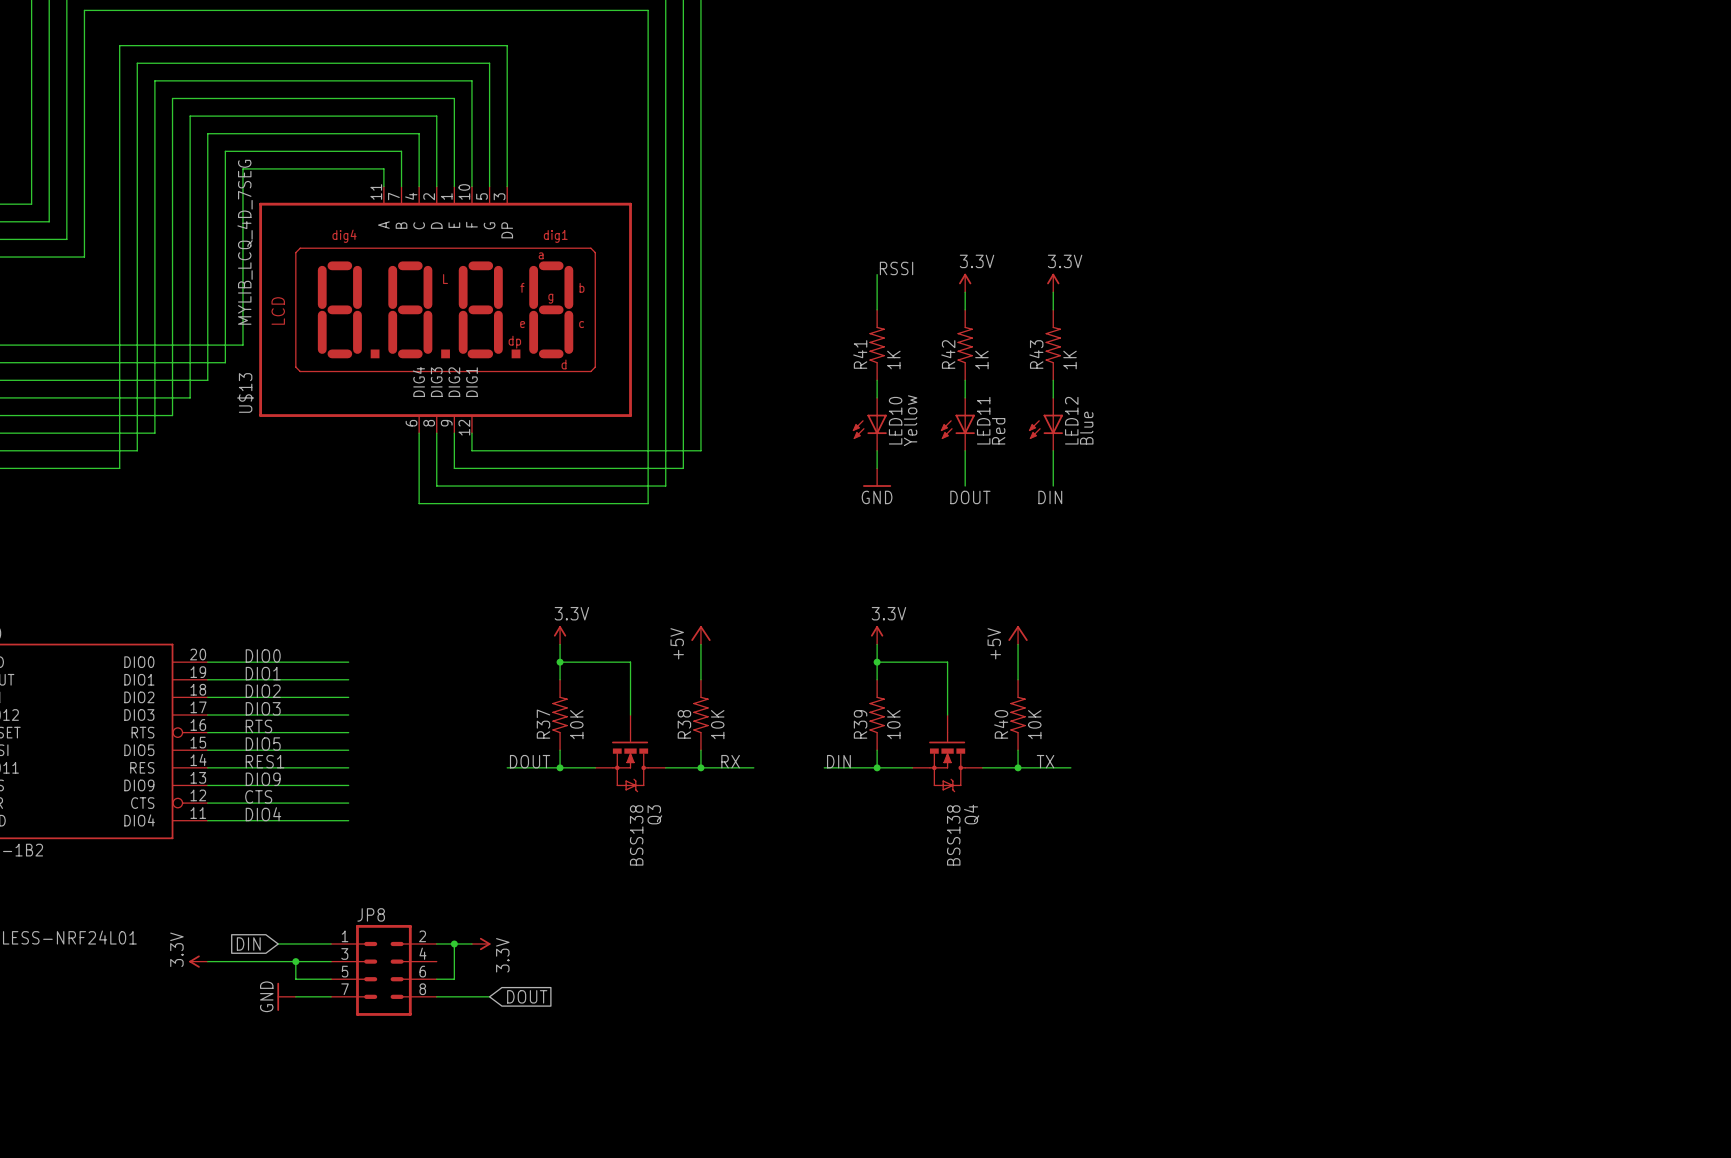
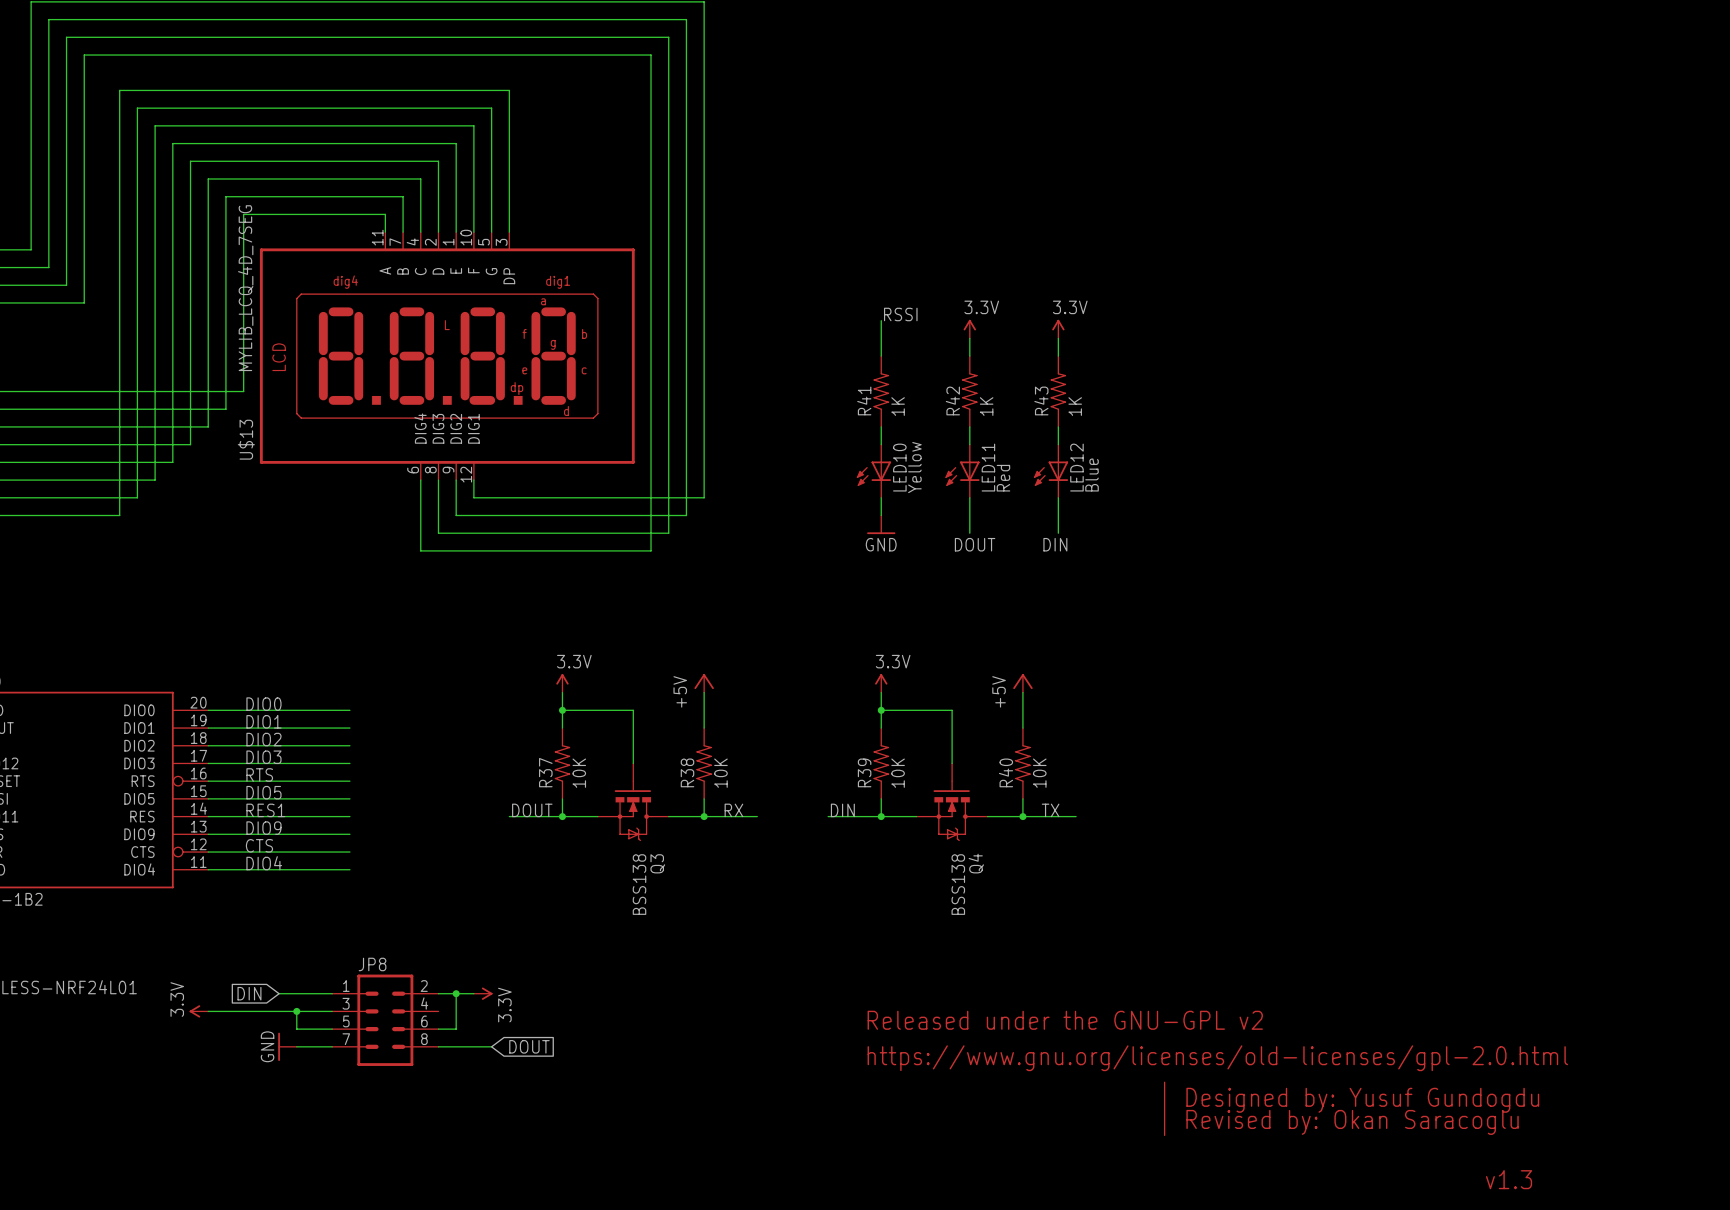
text: none -> Released under the GNU-GPL v2 (1065, 1020)
text: none -> https://www.gnu.org/licenses/old-licenses/gpl-2.0.html (1217, 1058)
line: none -> (1164, 1082) (1164, 1135)
text: none -> Designed by: Yusuf Gundogdu (1362, 1100)
text: none -> Revised by: Okan Saracoglu (1352, 1122)
text: none -> v1.3 (1509, 1179)

